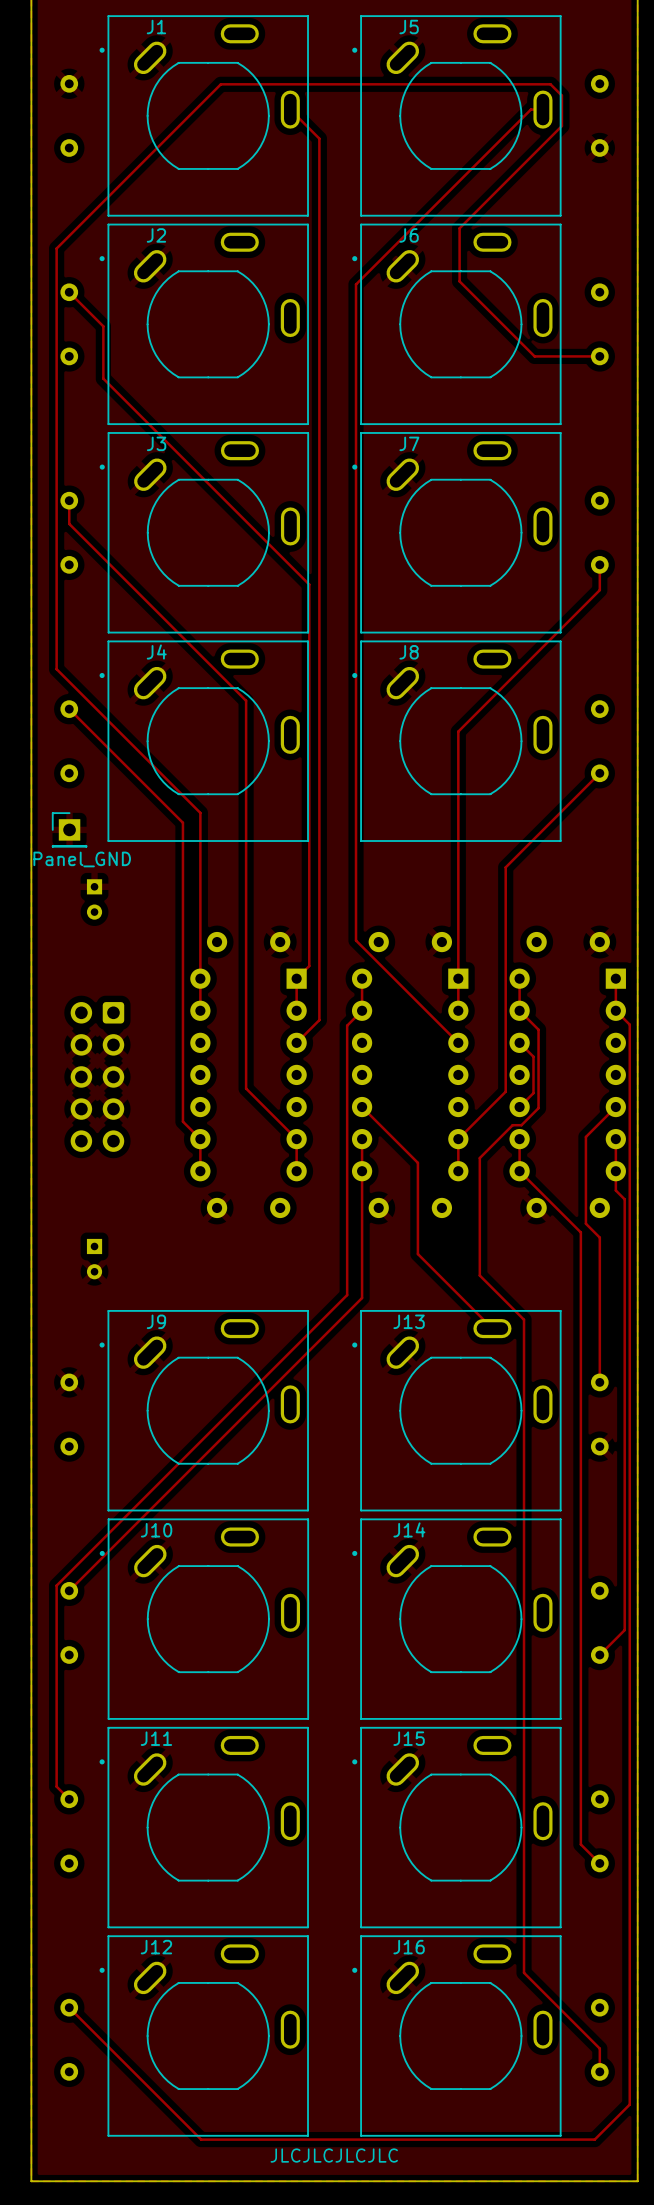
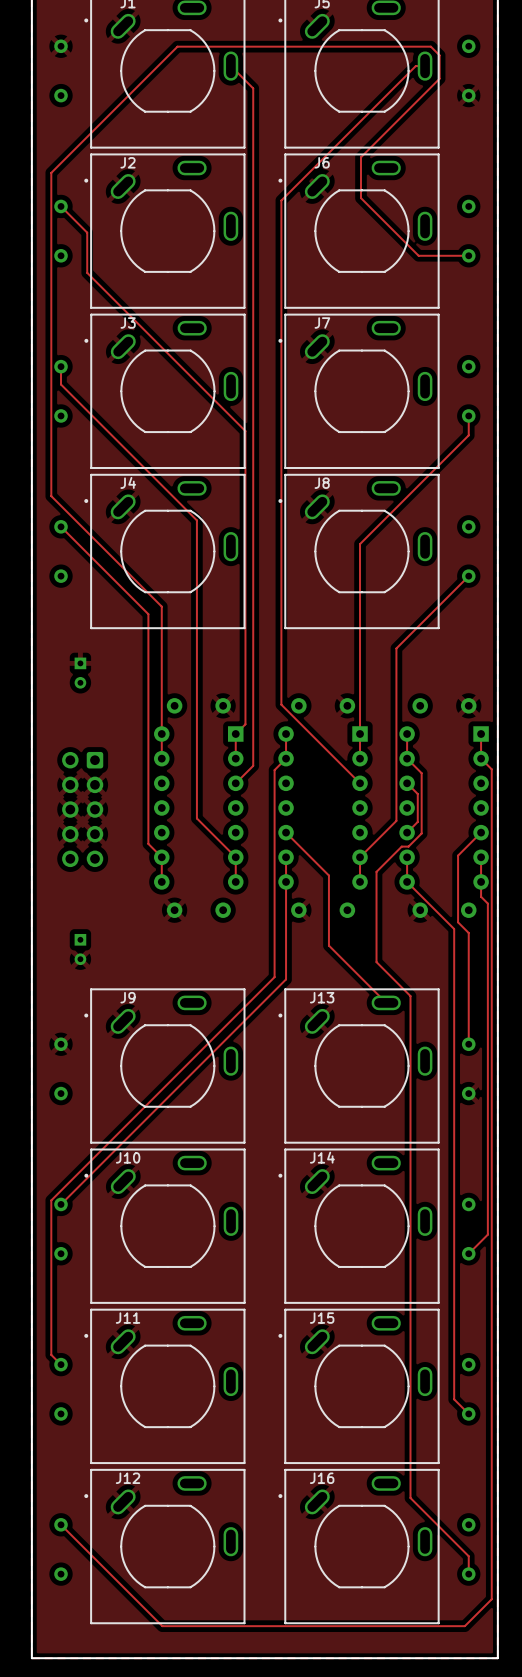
part: Panel_GND (69, 829) -> none
text: JLCJLCJLCJLC (334, 2155) -> none

